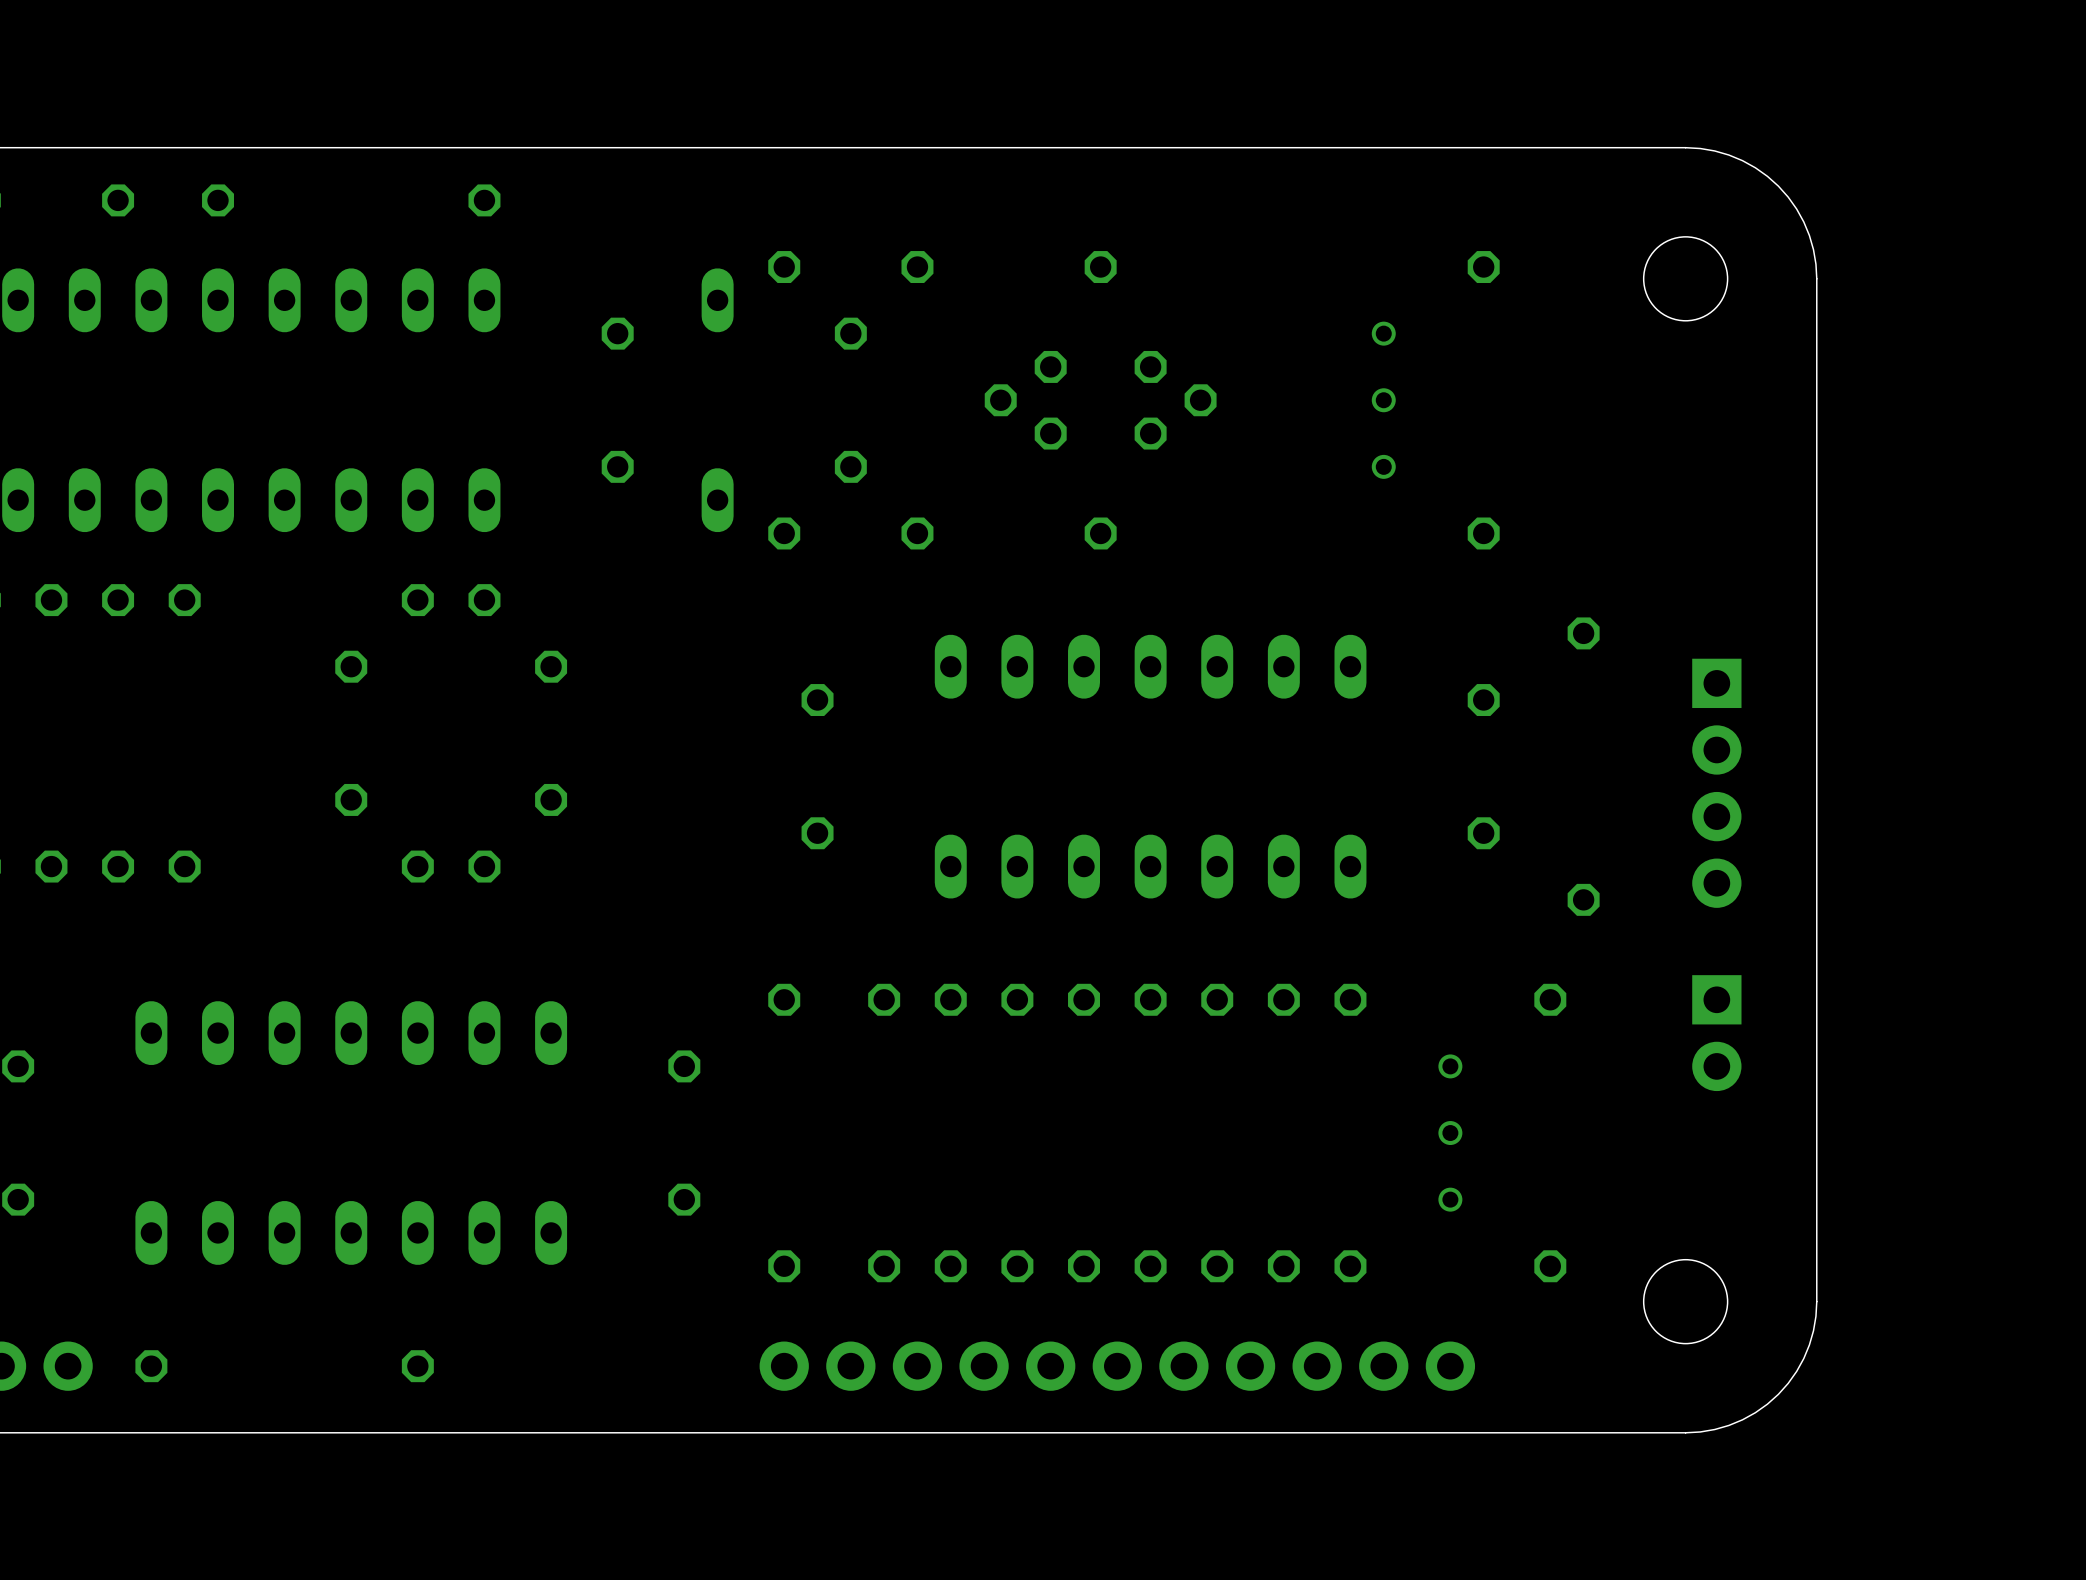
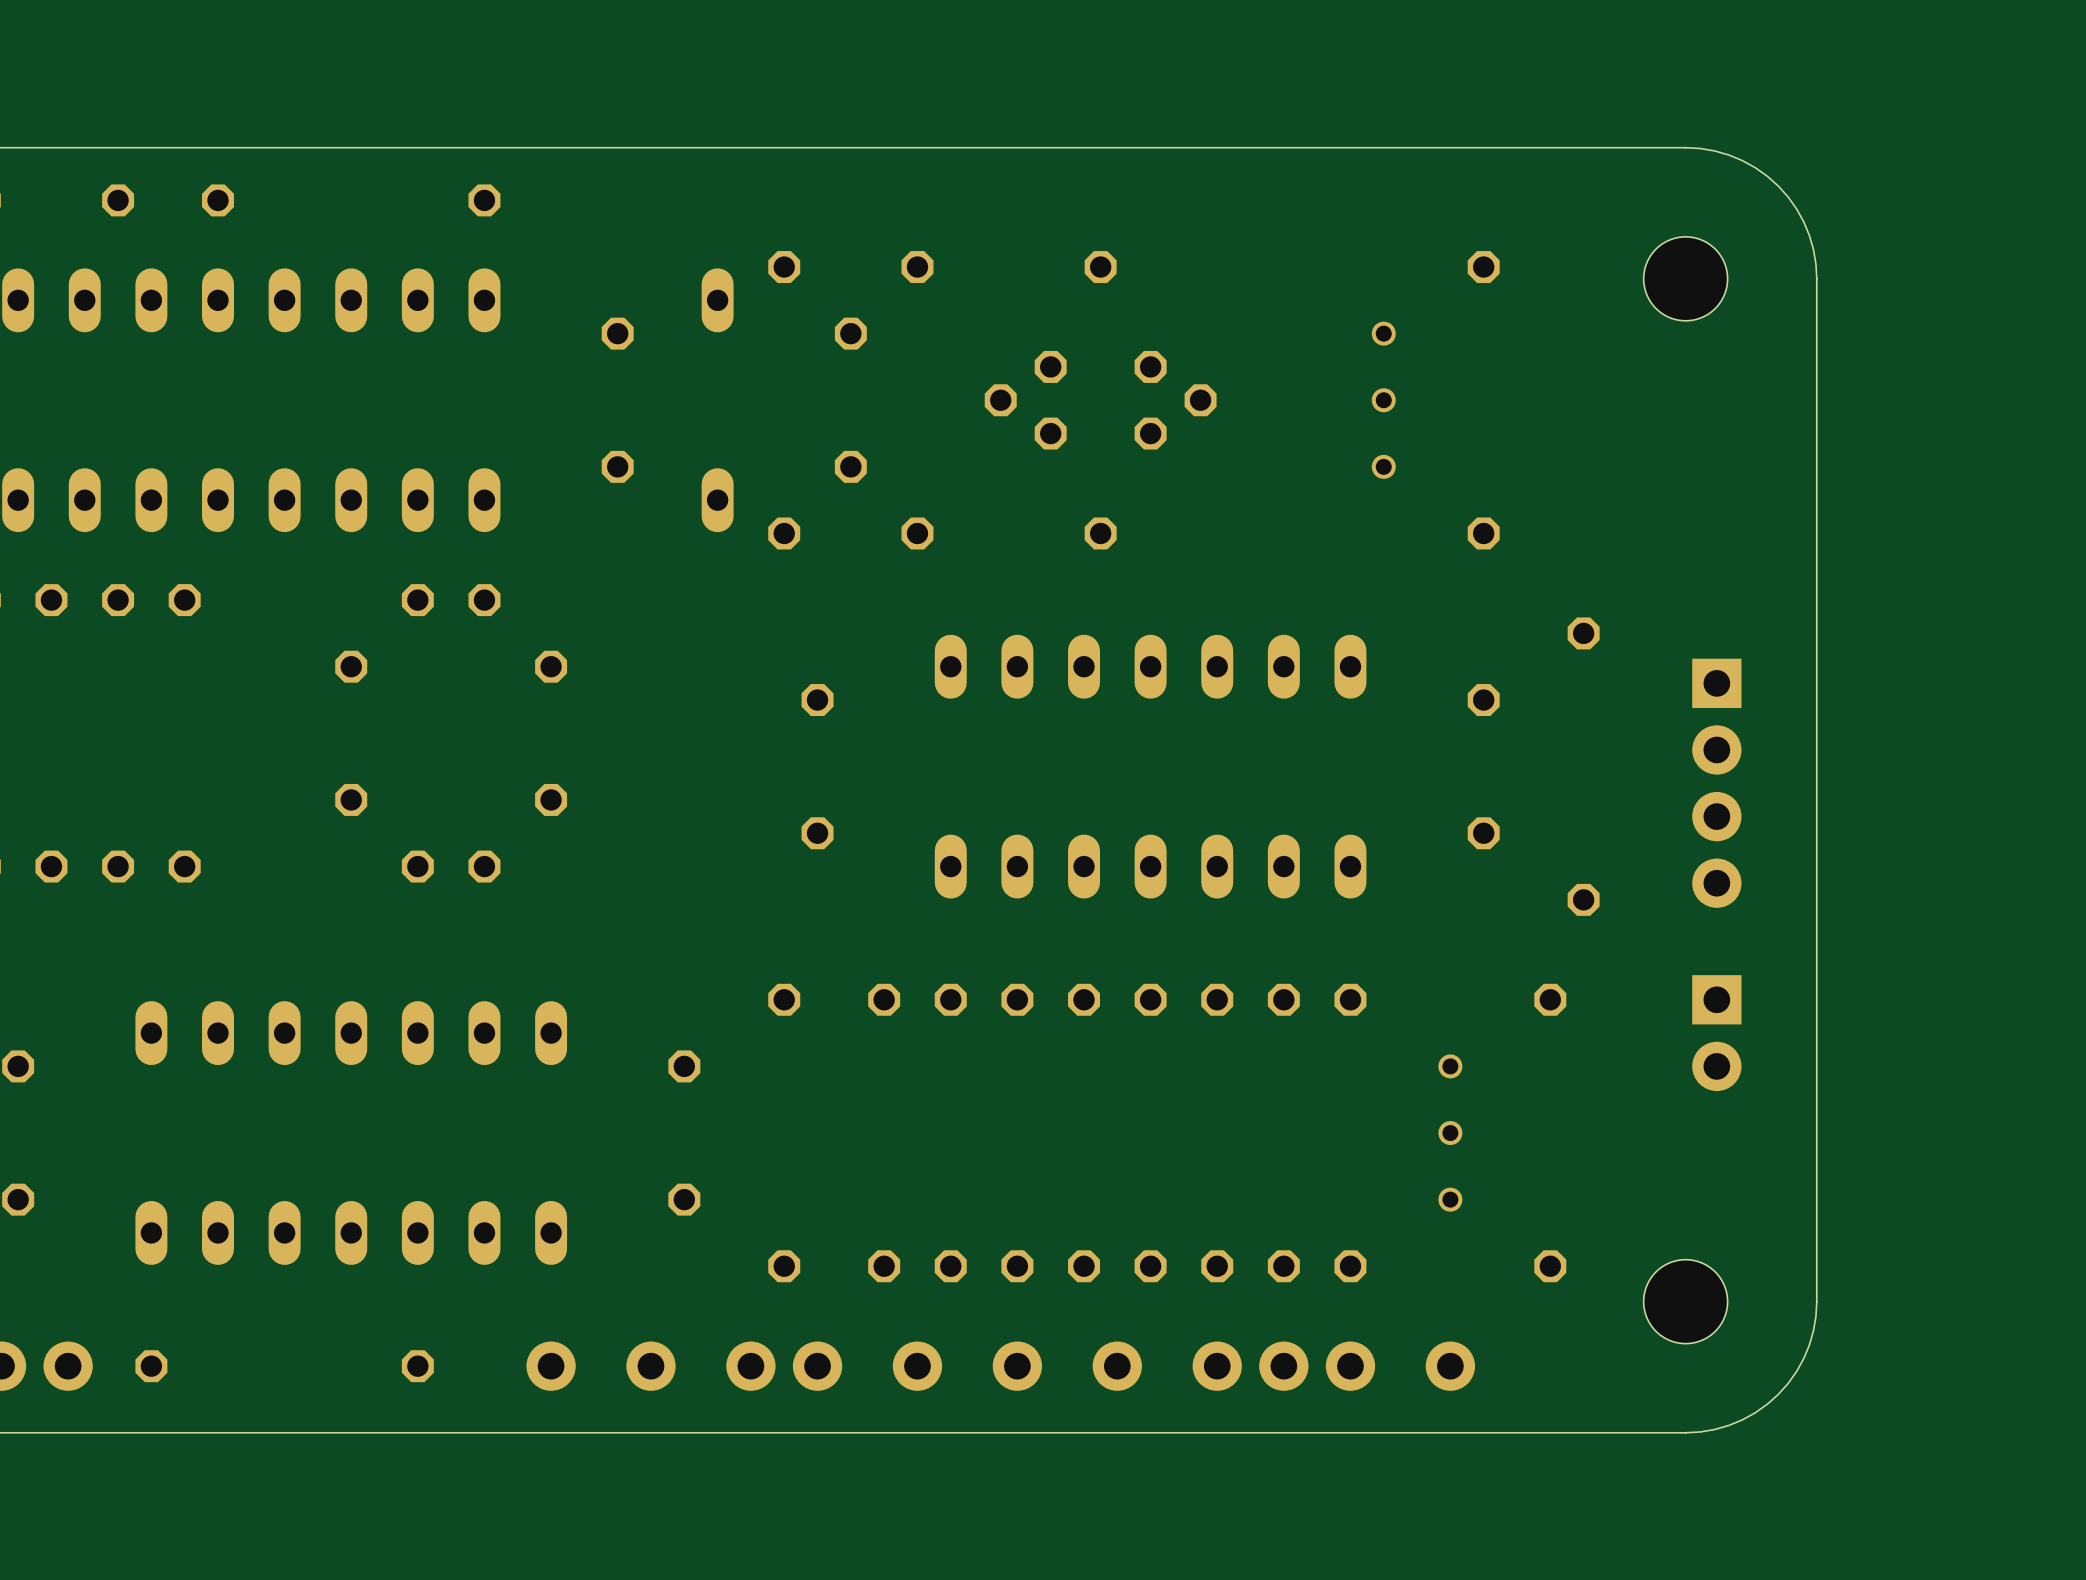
part footprint: [759, 1341, 809, 1391] -> [726, 1341, 843, 1391]
part: none -> (551, 1366)
part: none -> (651, 1366)
part: (850, 1366) -> none
part: (950, 1366) -> none
part position: (1050, 1366) -> (1017, 1366)
part: (1183, 1366) -> none
part position: (1317, 1366) -> (1283, 1366)

